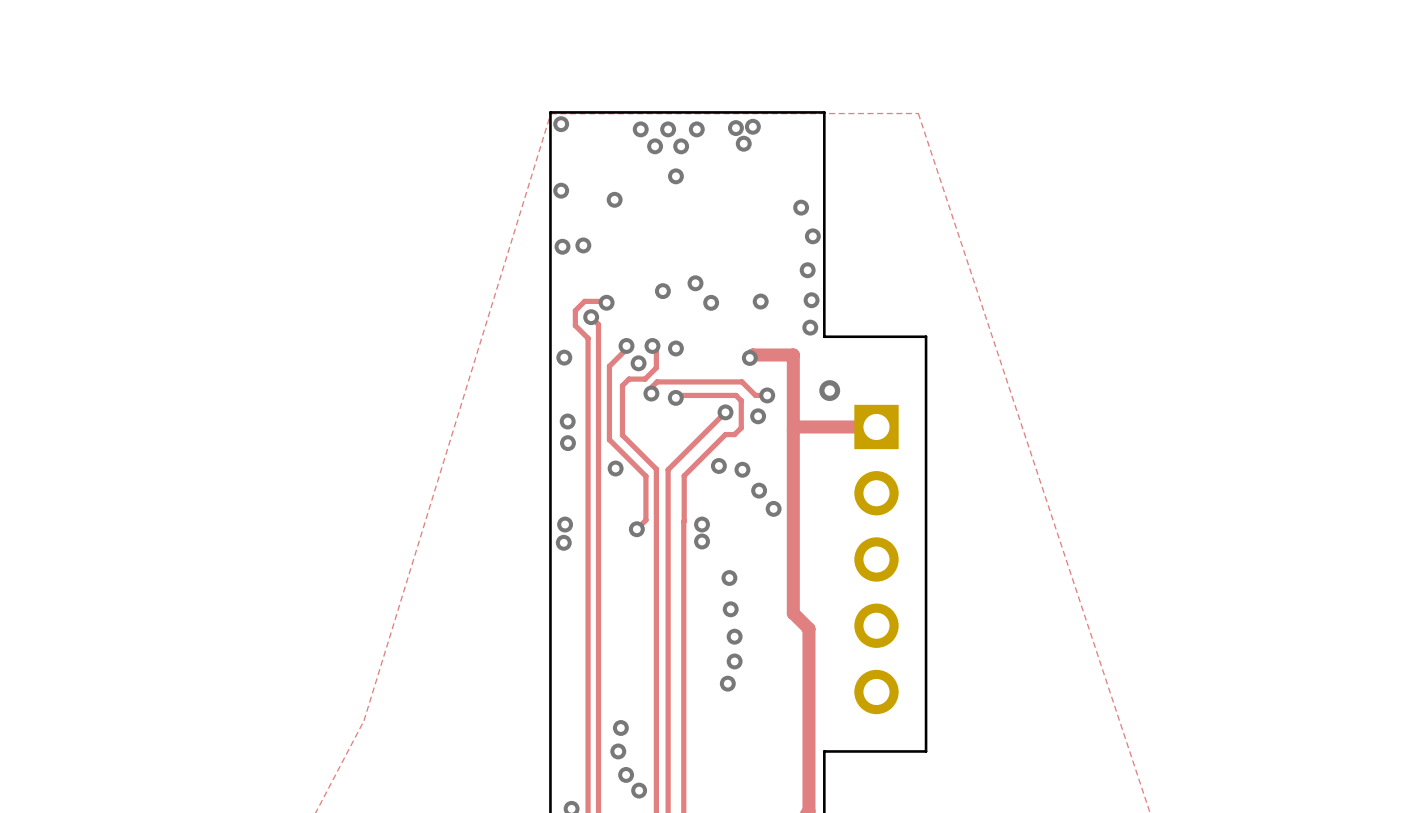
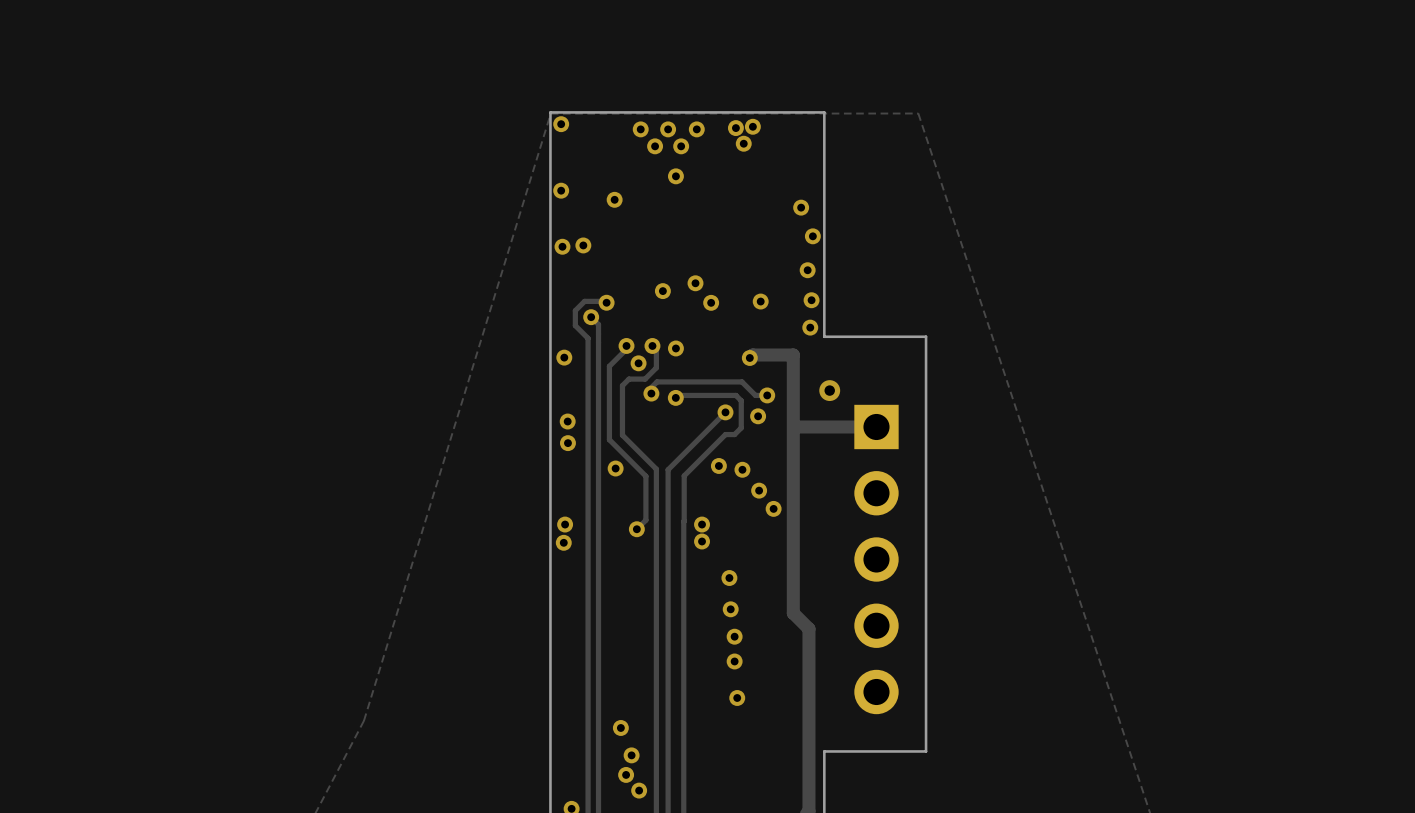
via position: (727, 683) -> (737, 697)
via position: (618, 751) -> (631, 755)

